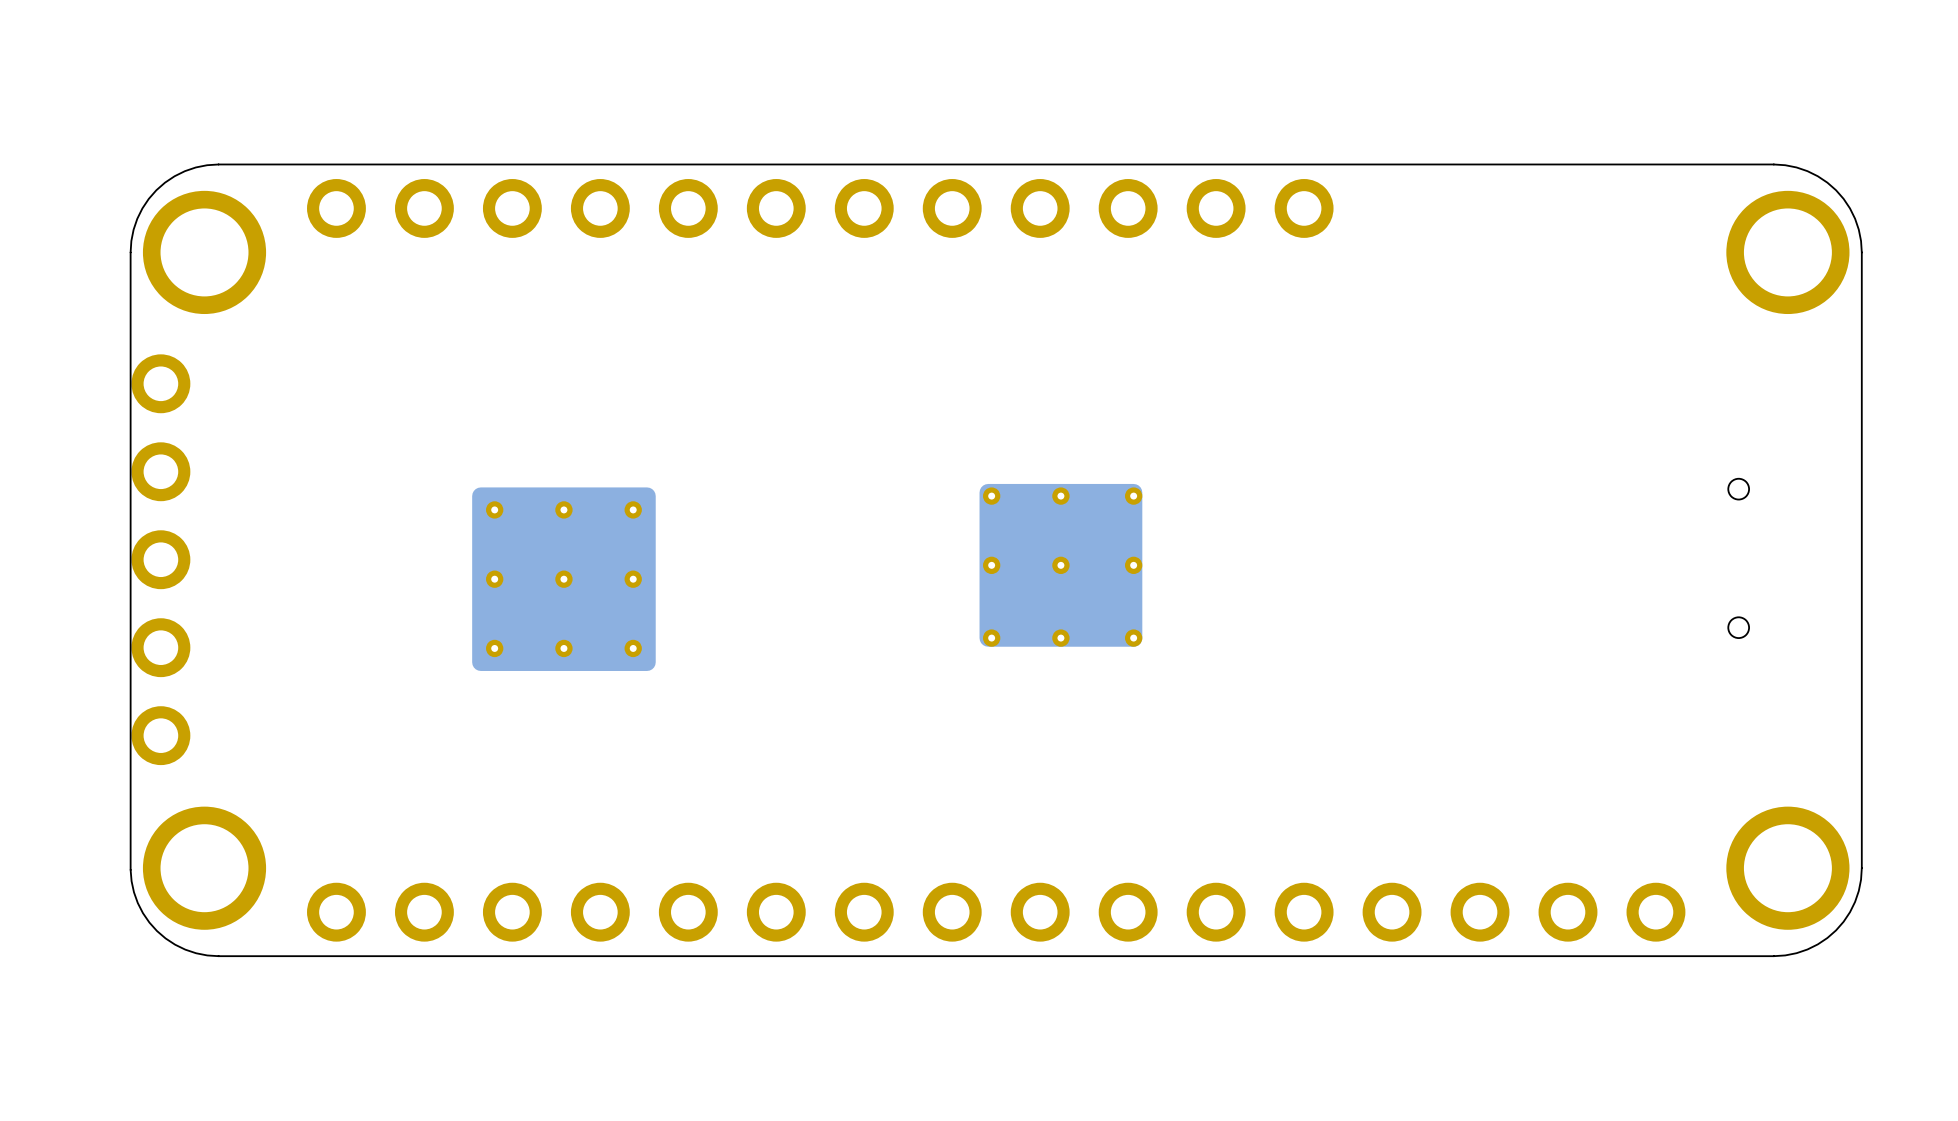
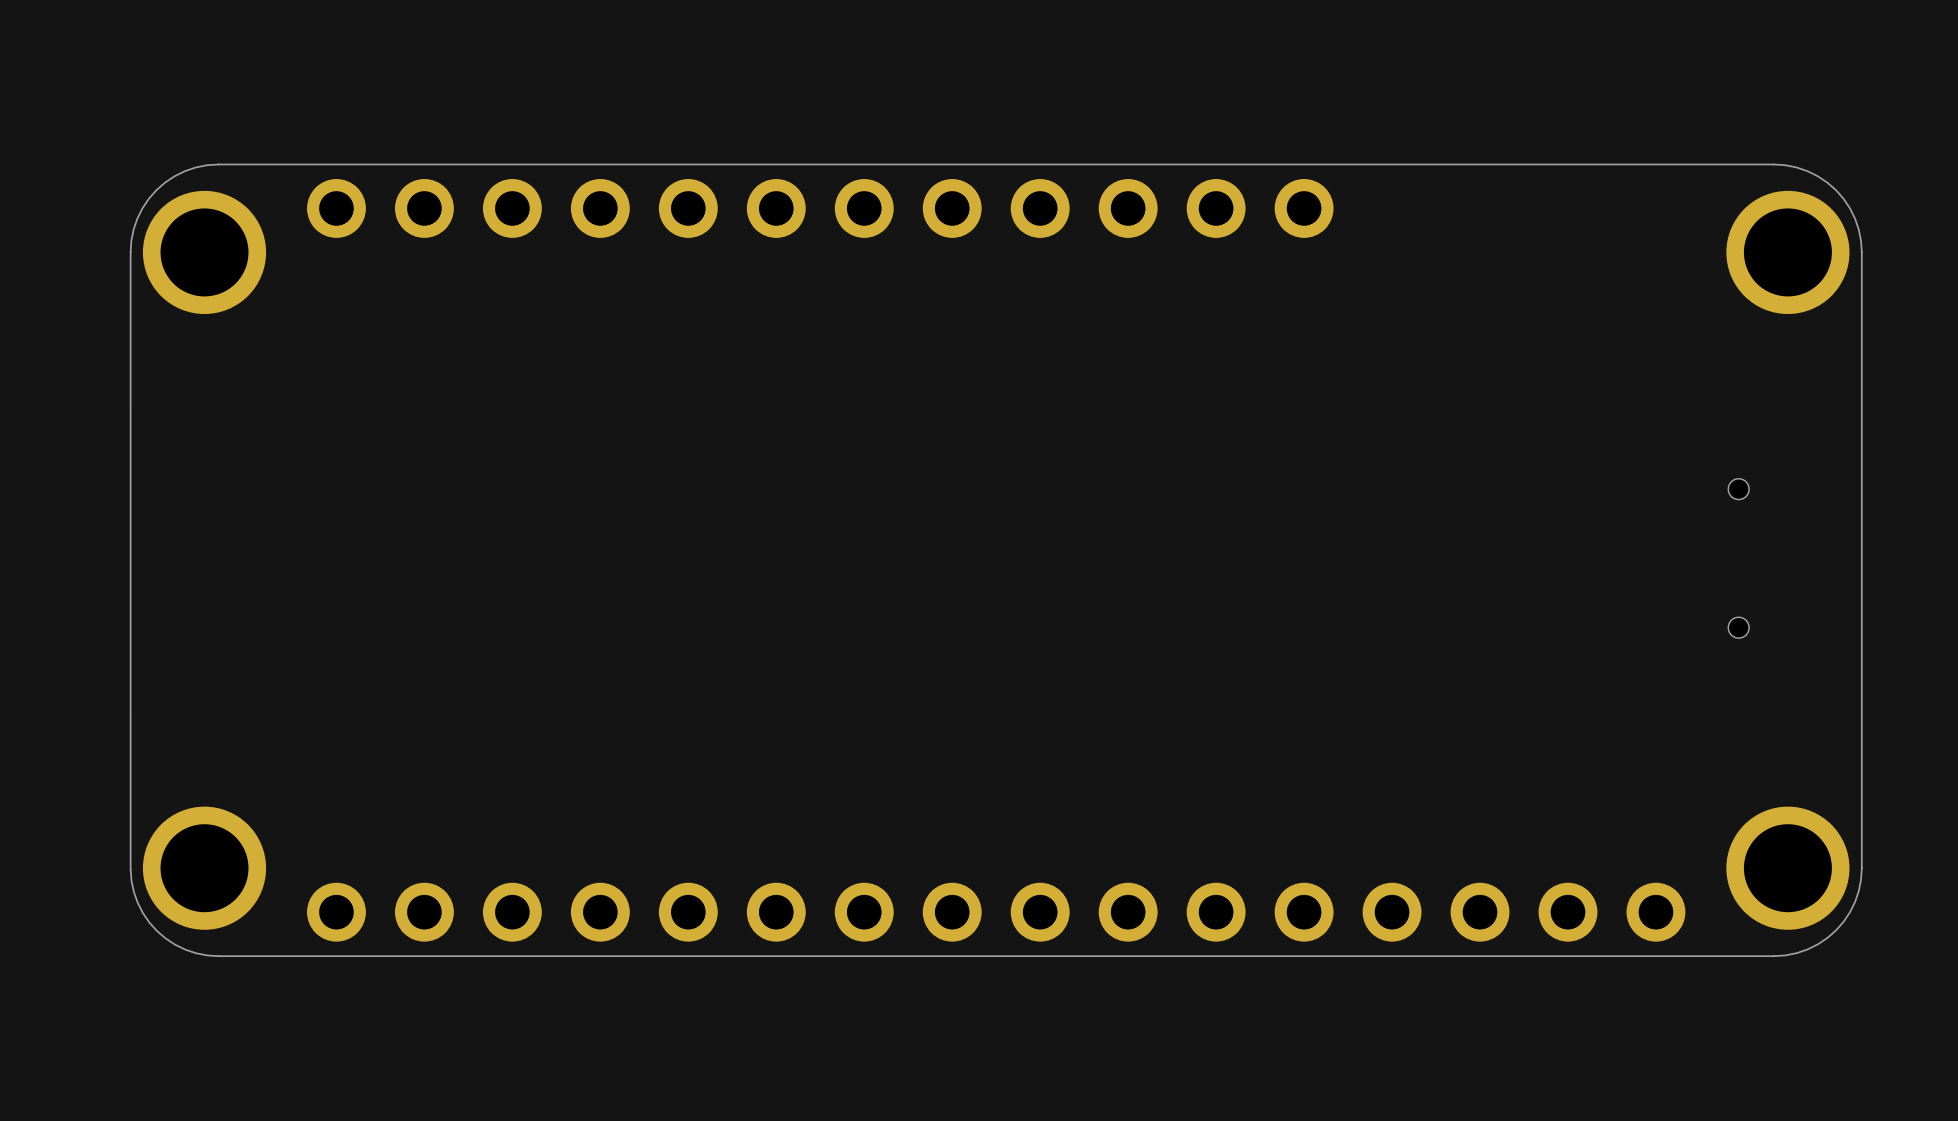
part: (160, 559) -> none
part: (1060, 565) -> none
part: (563, 579) -> none

